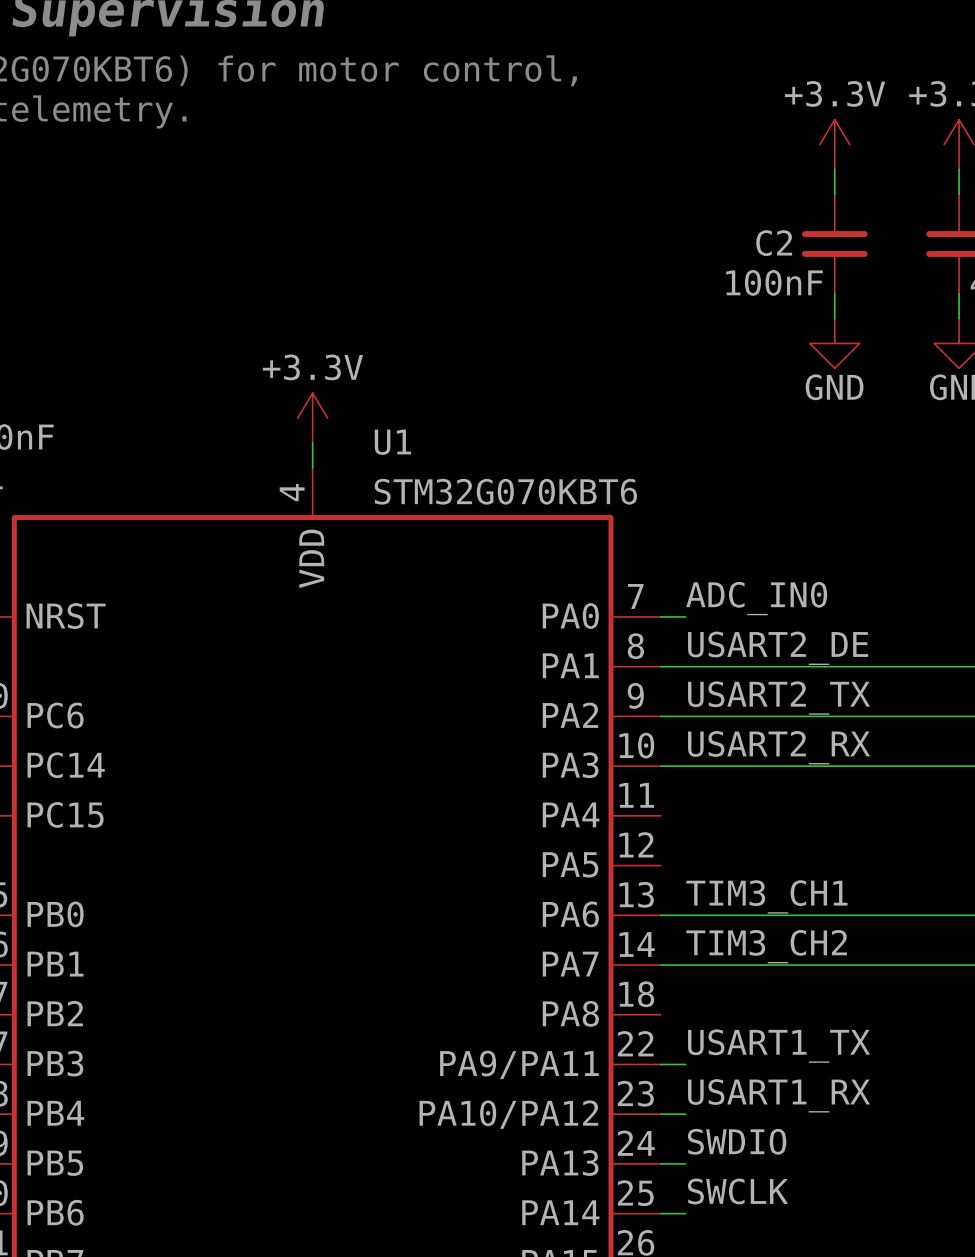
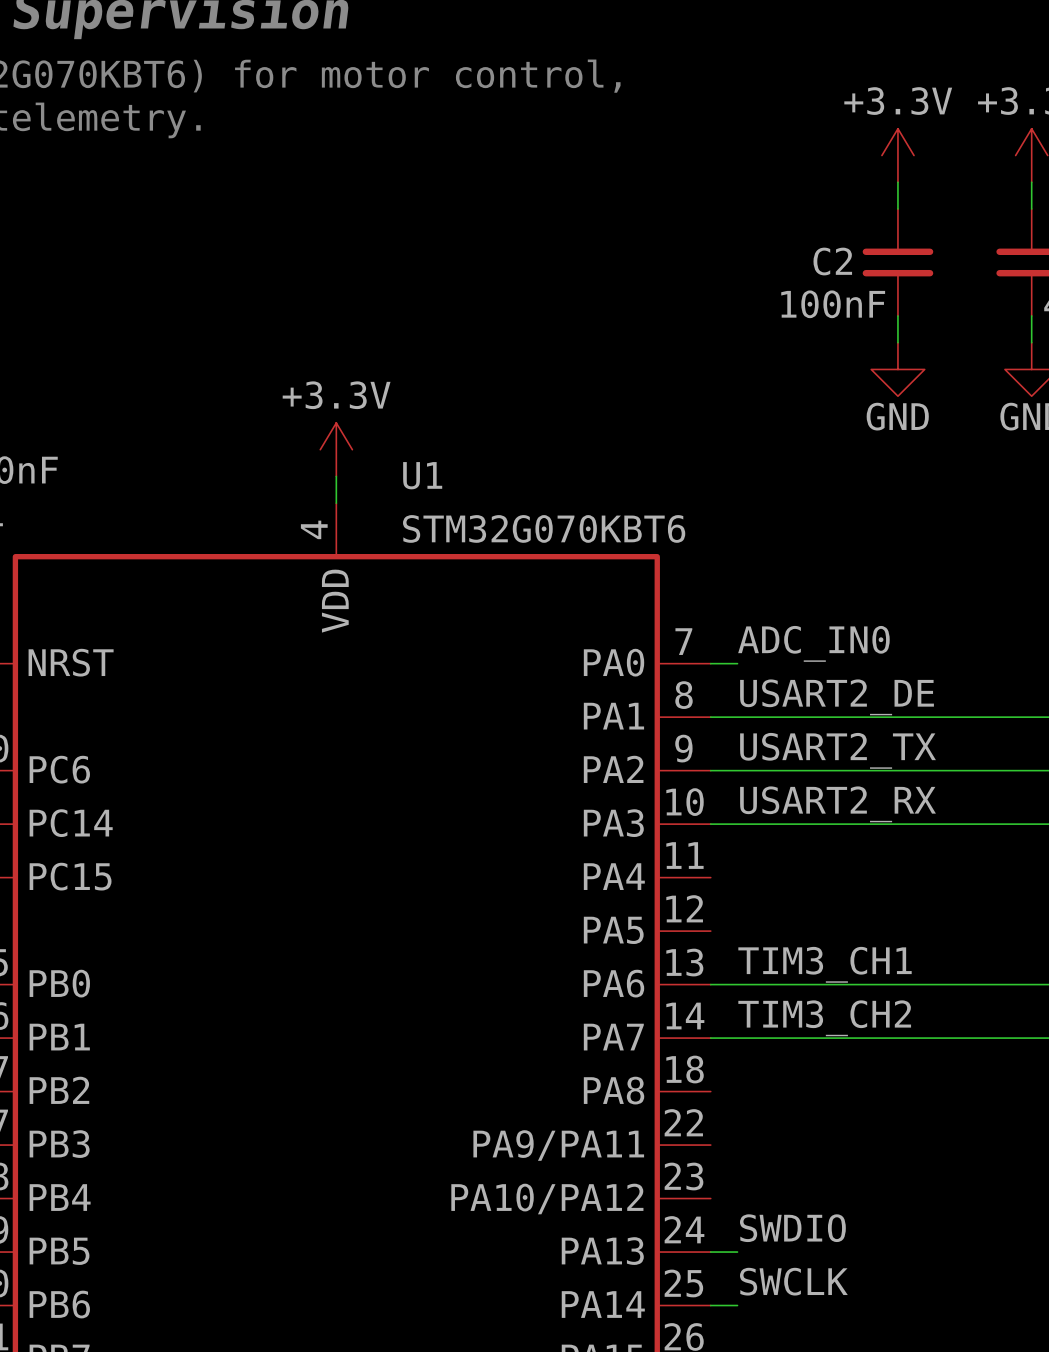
label: USART1_TX (779, 1046) -> none
wire: (660, 1064) (685, 1064) -> none
label: USART1_RX (779, 1095) -> none
wire: (660, 1114) (685, 1114) -> none

